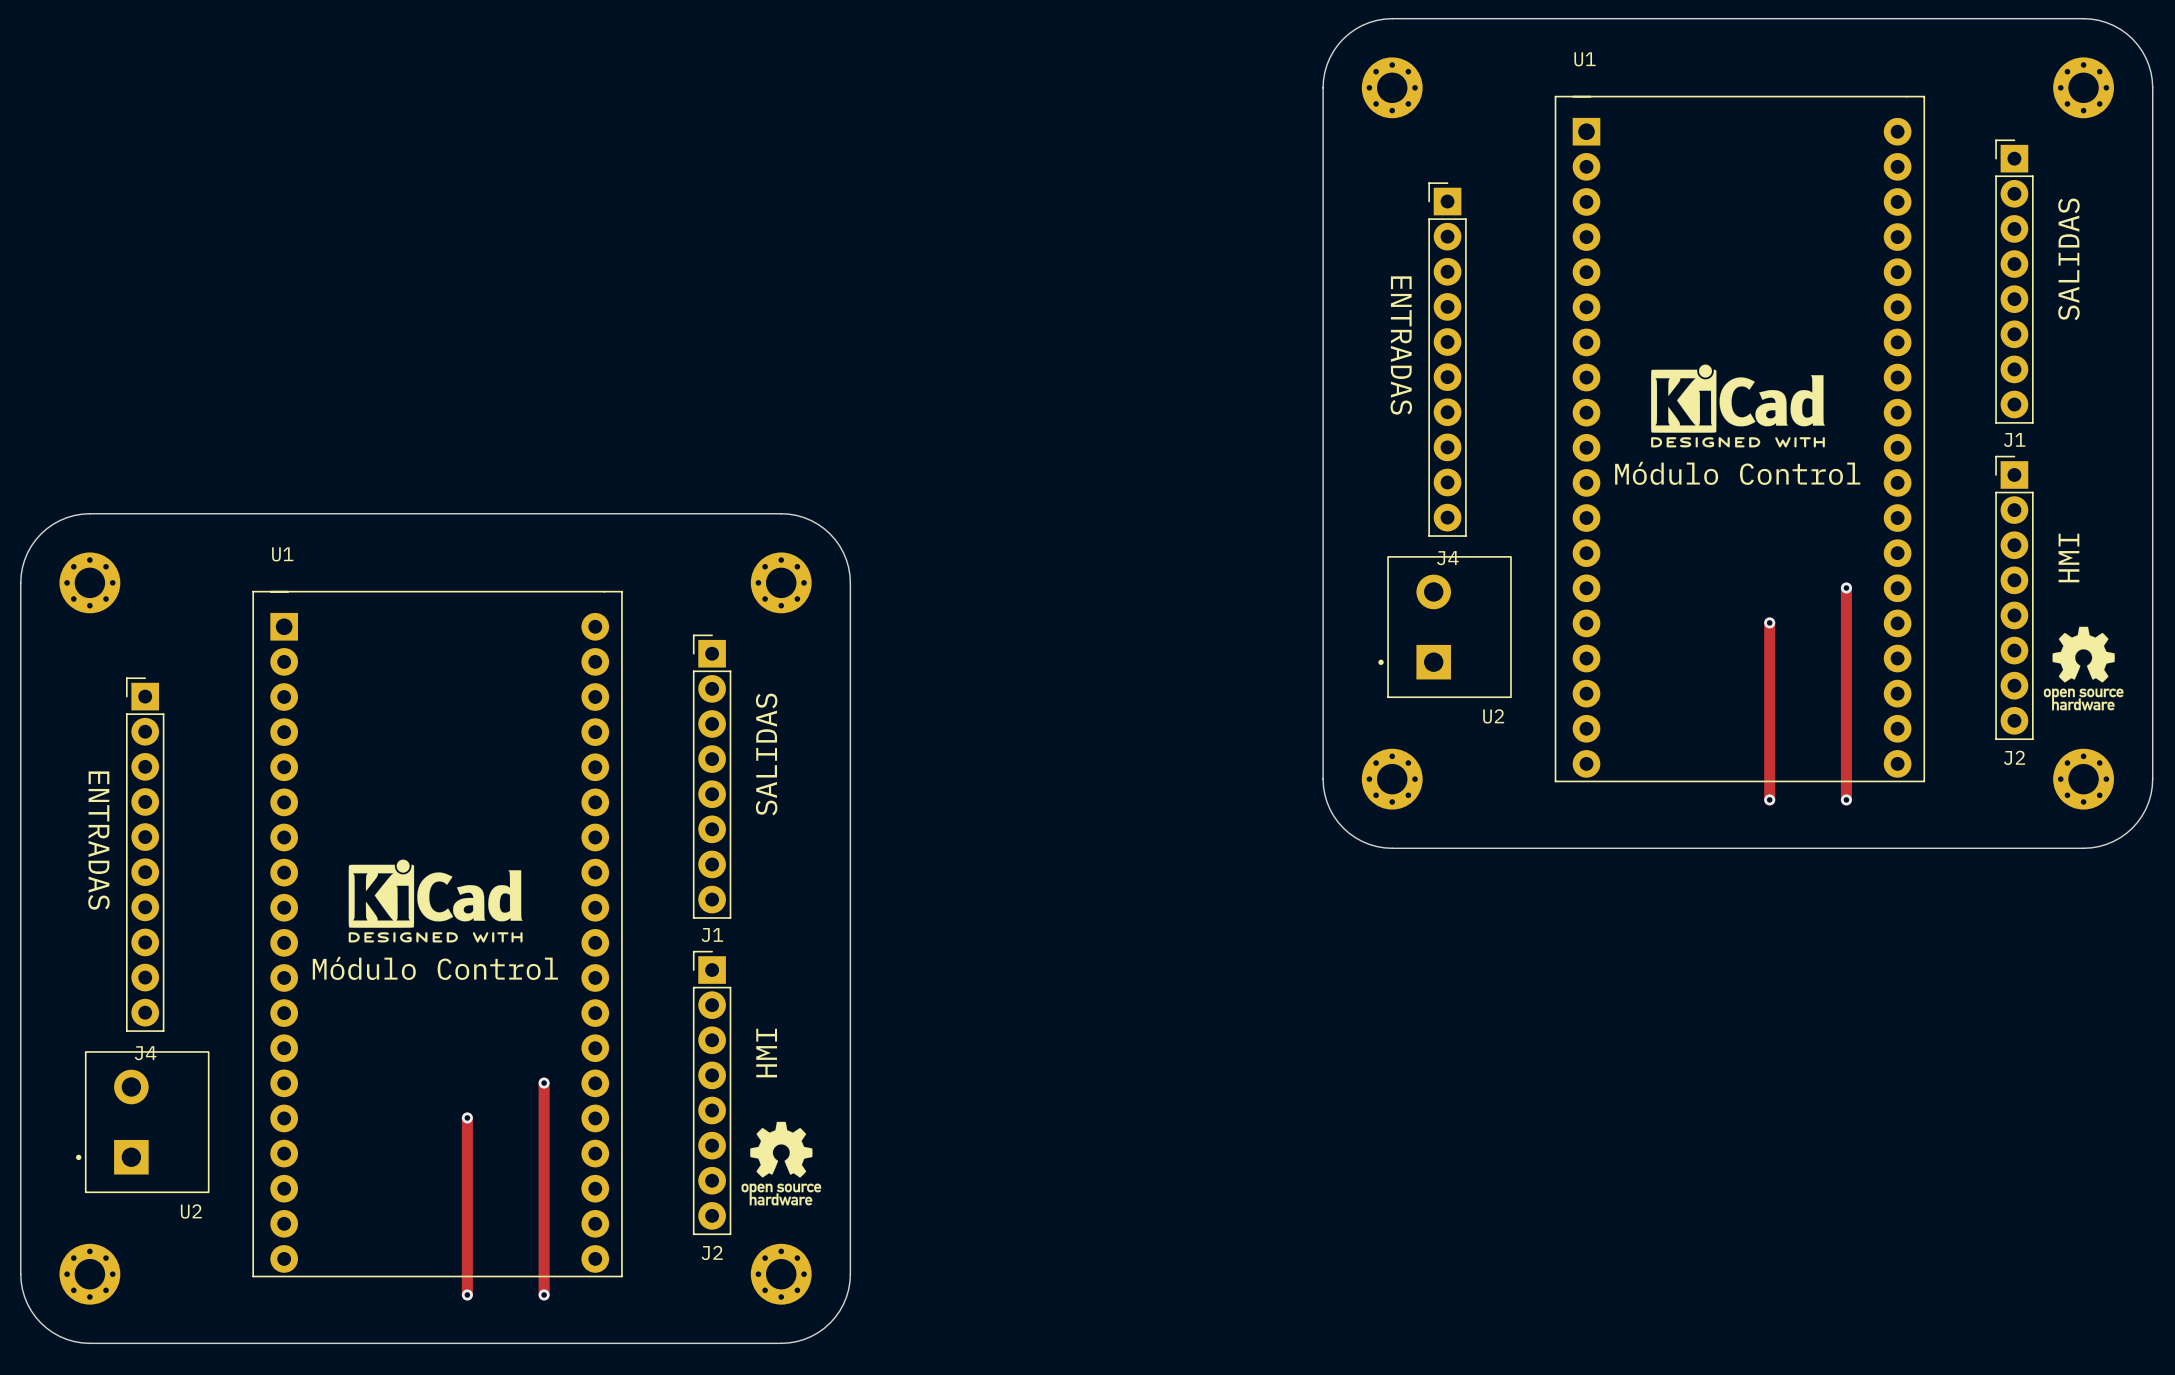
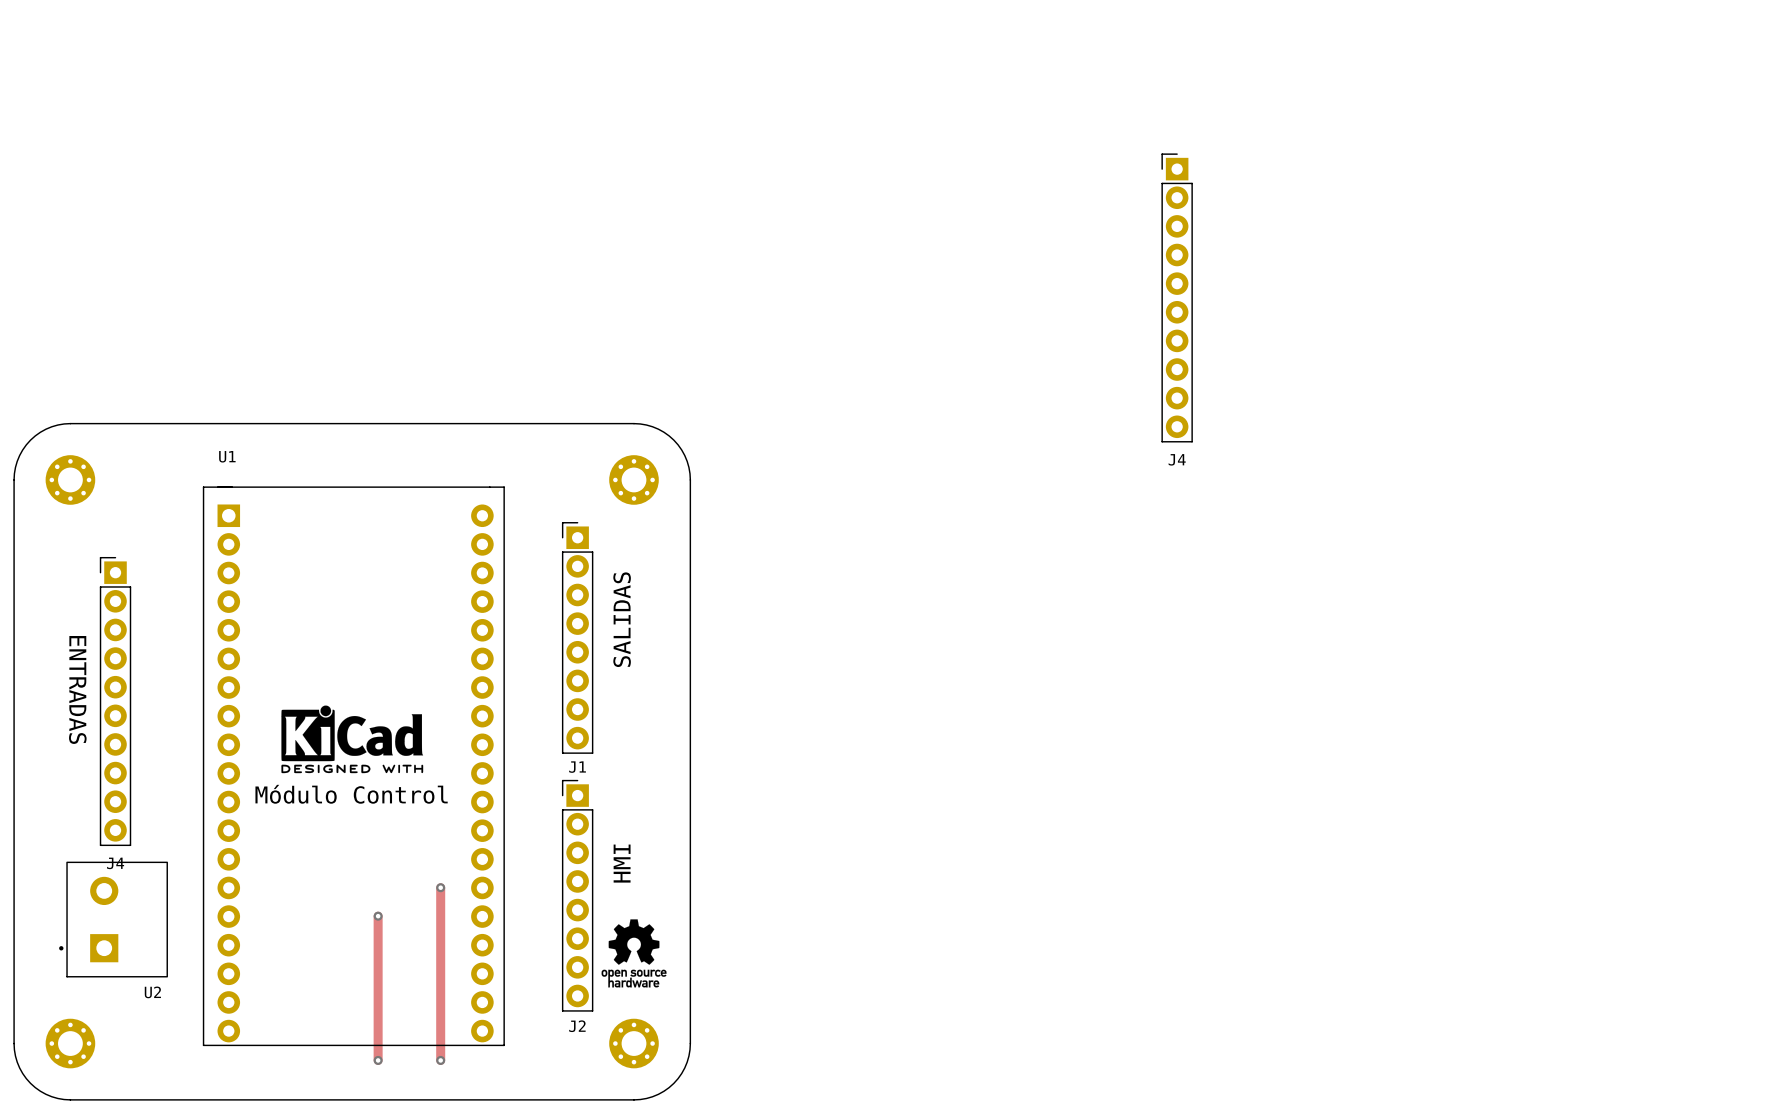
board edge: (1392, 18) (2083, 18) (2106, 22) (2120, 29) (2132, 38) (2142, 51) (2148, 64) (2152, 87) (2152, 779) (2148, 801) (2142, 815) (2132, 828) (2120, 837) (2106, 844) (2083, 848) (1392, 848) (1369, 844) (1355, 837) (1343, 828) (1333, 815) (1326, 801) (1323, 779) (1323, 80) (1326, 64) (1333, 51) (1349, 33) (1369, 22) (1392, 18) -> none
part: (1392, 87) -> none
part: (2083, 87) -> none
text: SALIDAS (2068, 259) -> none
J1: (2014, 281) -> none
text: ENTRADAS (1401, 345) -> none
drawing: [1651, 364, 1825, 448] -> none
U1: (1739, 439) -> none
text: Módulo Control (1737, 473) -> none
text: HMI (2068, 557) -> none
track: (1846, 588) (1846, 799) -> none
via: (1846, 588) -> none
J2: (2014, 597) -> none
track: (1769, 622) (1769, 799) -> none
via: (1769, 622) -> none
drawing: [2043, 626, 2124, 711] -> none
U2: (1445, 627) -> none
part: (1392, 779) -> none
part: (2083, 779) -> none
via: (1769, 799) -> none
via: (1846, 799) -> none

